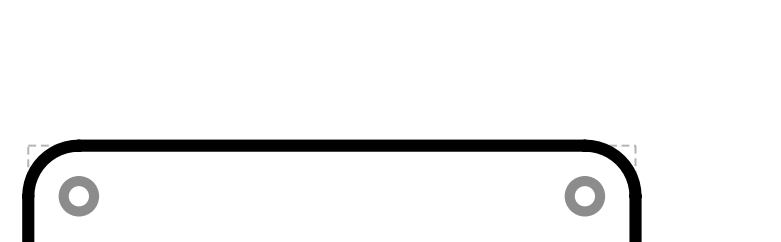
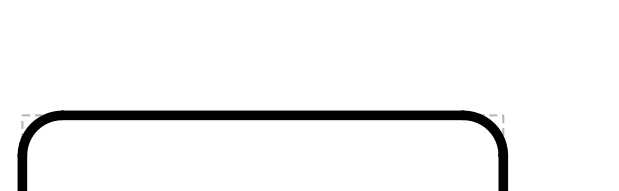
via: (78, 196) -> none
via: (584, 196) -> none

